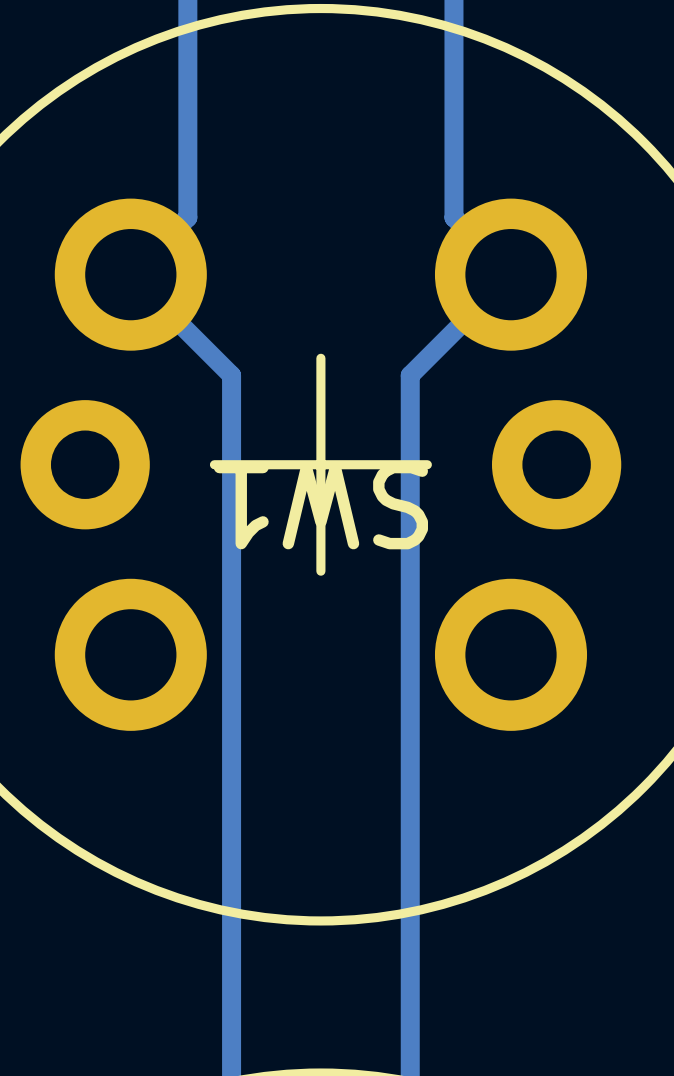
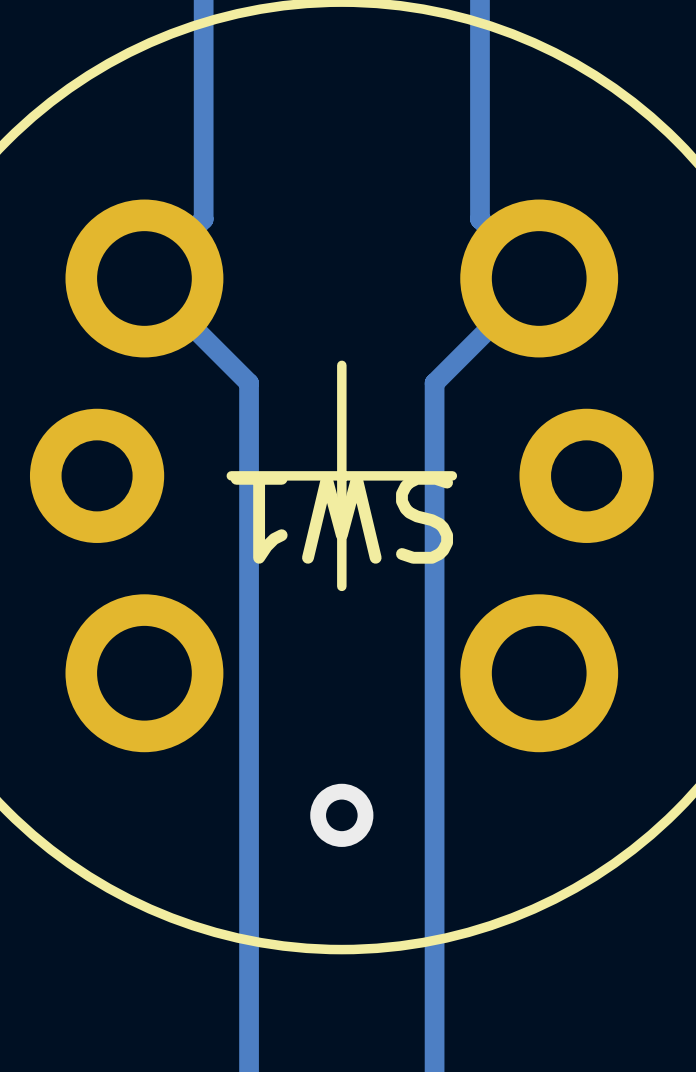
via: none -> (341, 815)

